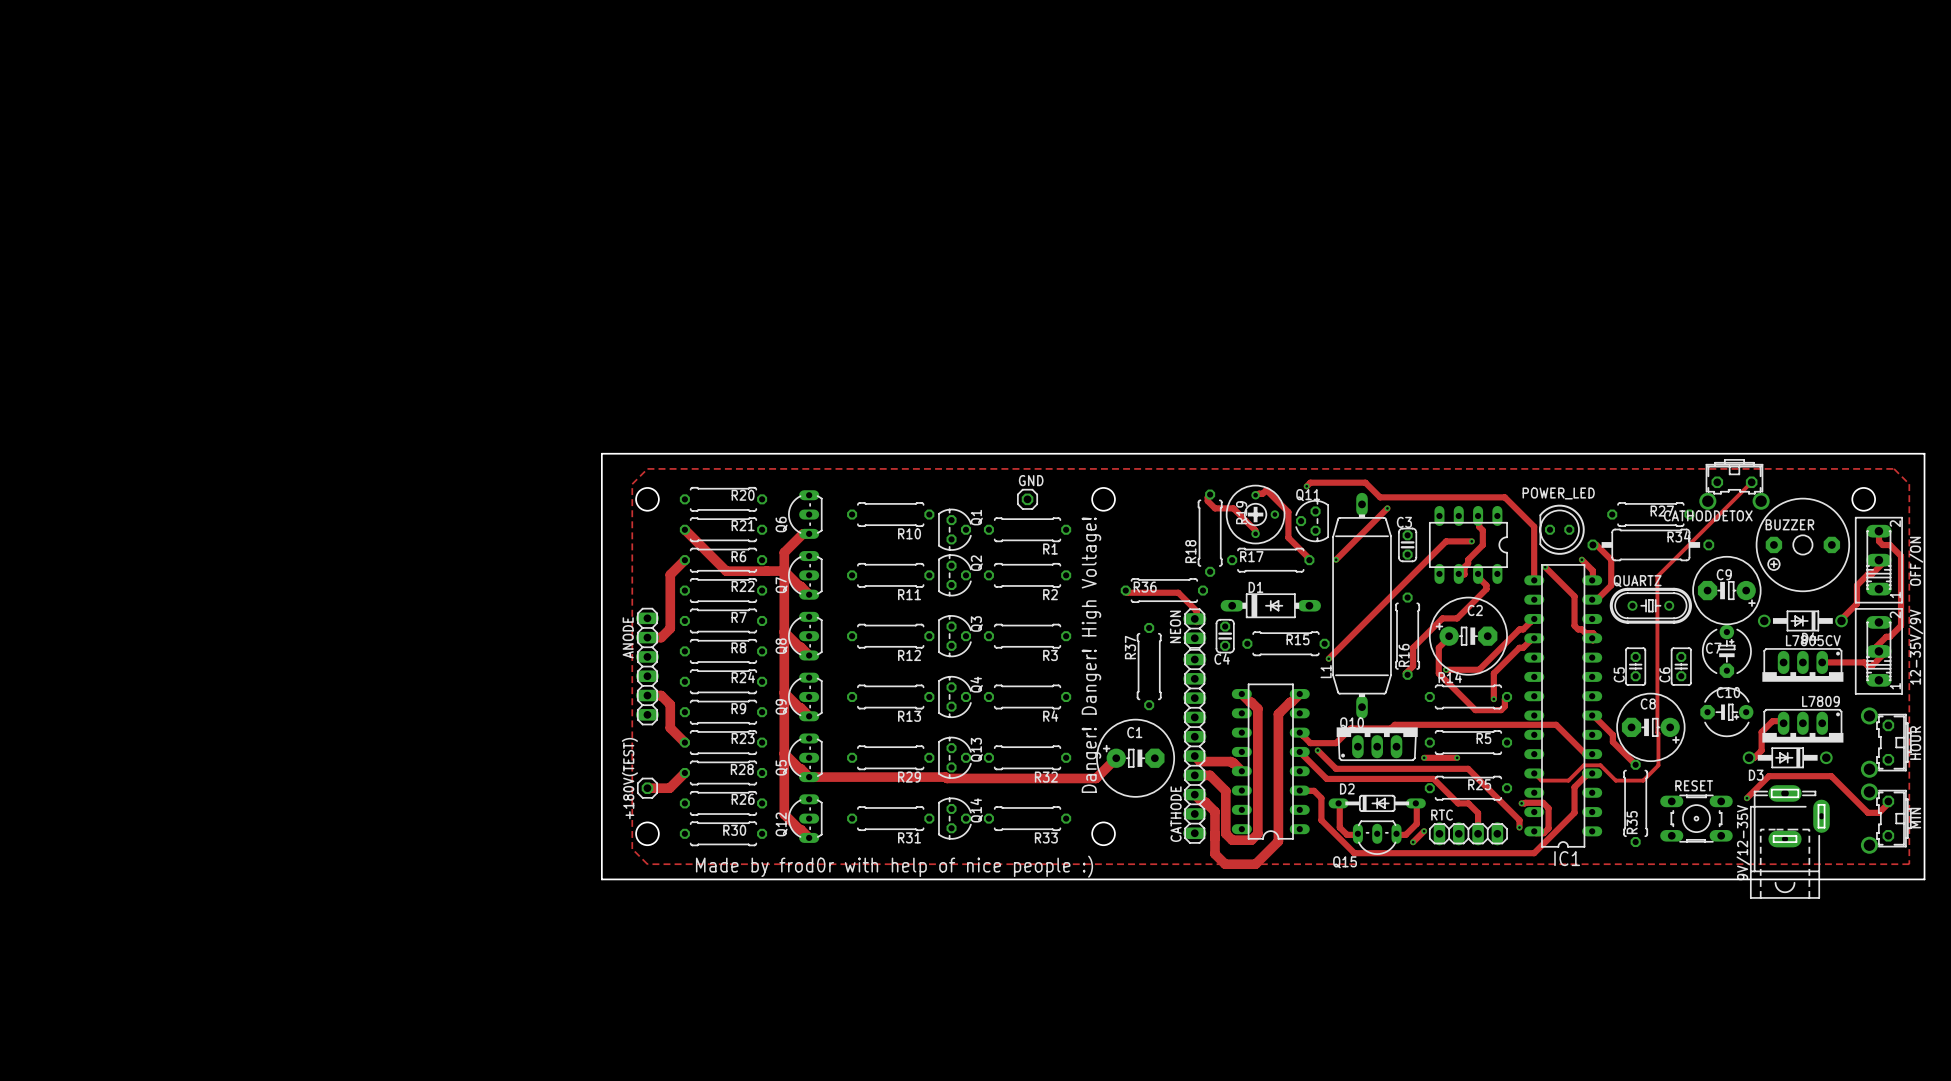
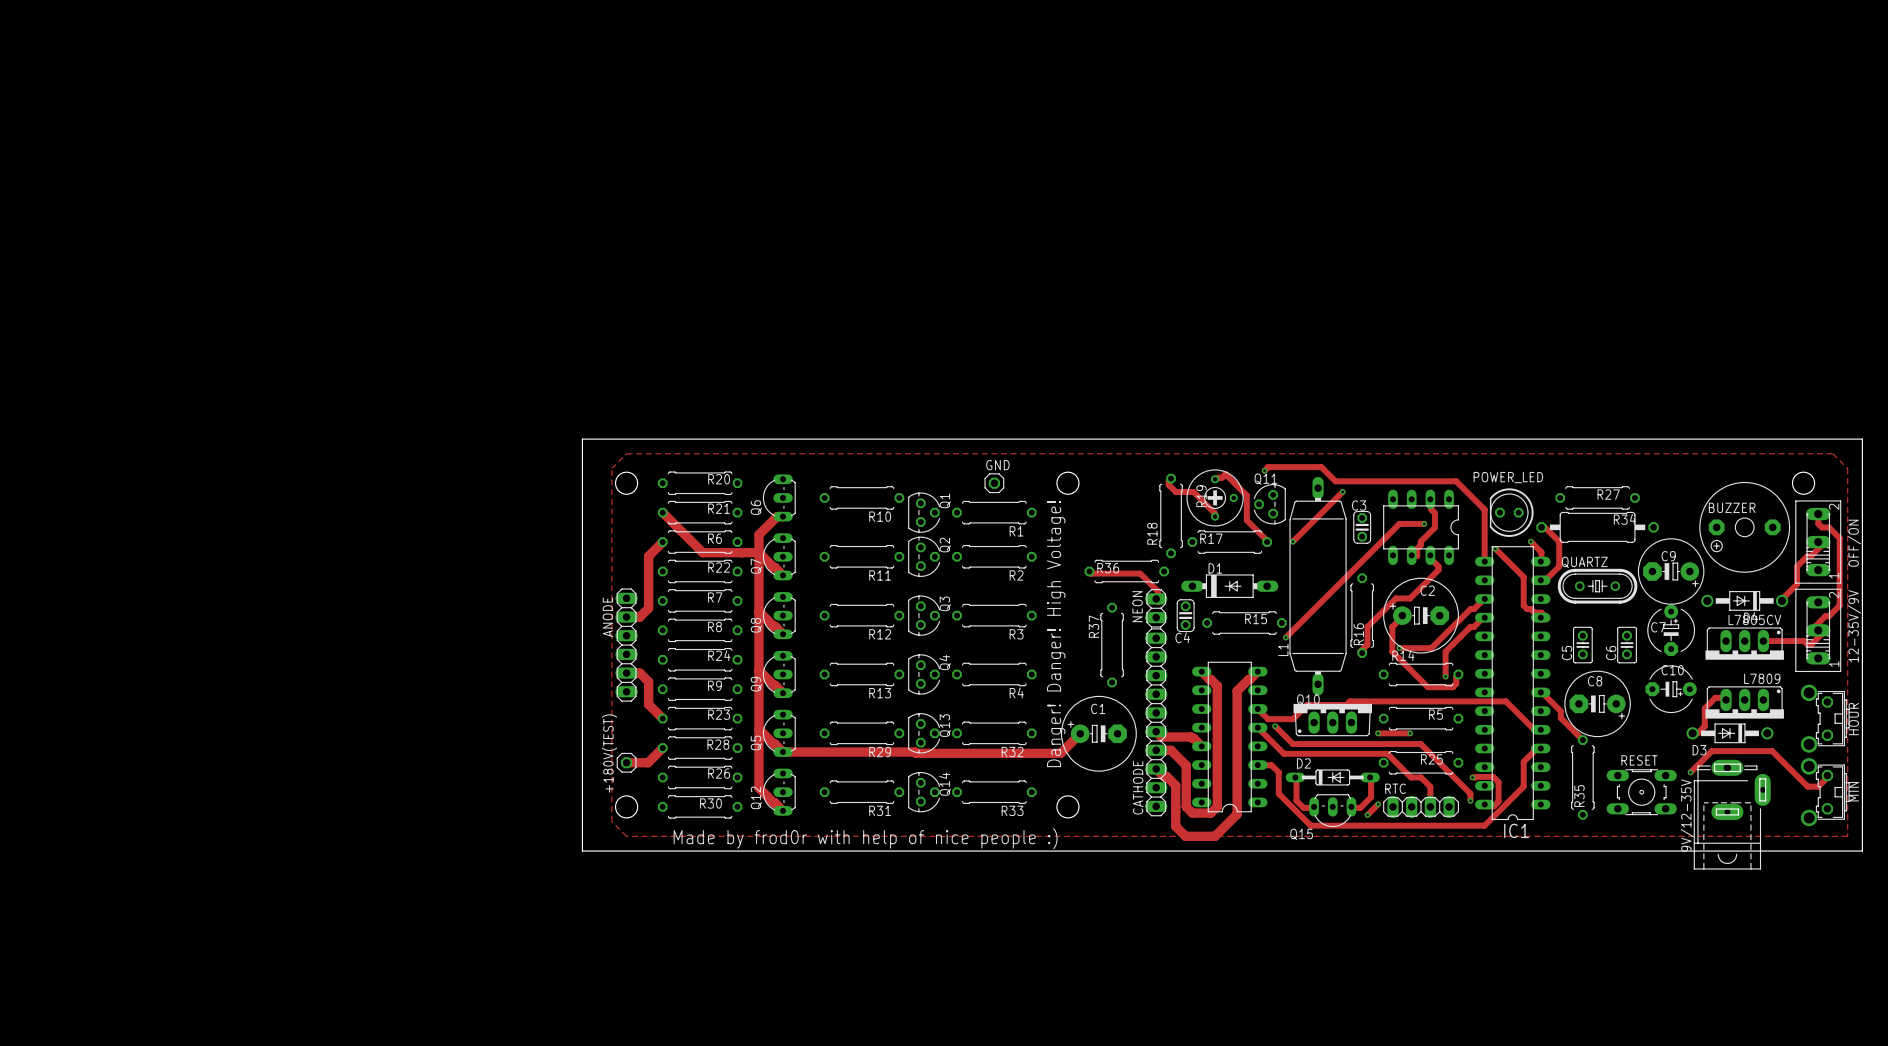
track: (1751, 482) (1657, 576) (1658, 765) (1643, 780) (1615, 780) (1600, 765) (1583, 765) (1568, 780) (1541, 780) (1534, 773) -> none
CATHODDETOX: (1734, 484) -> none

